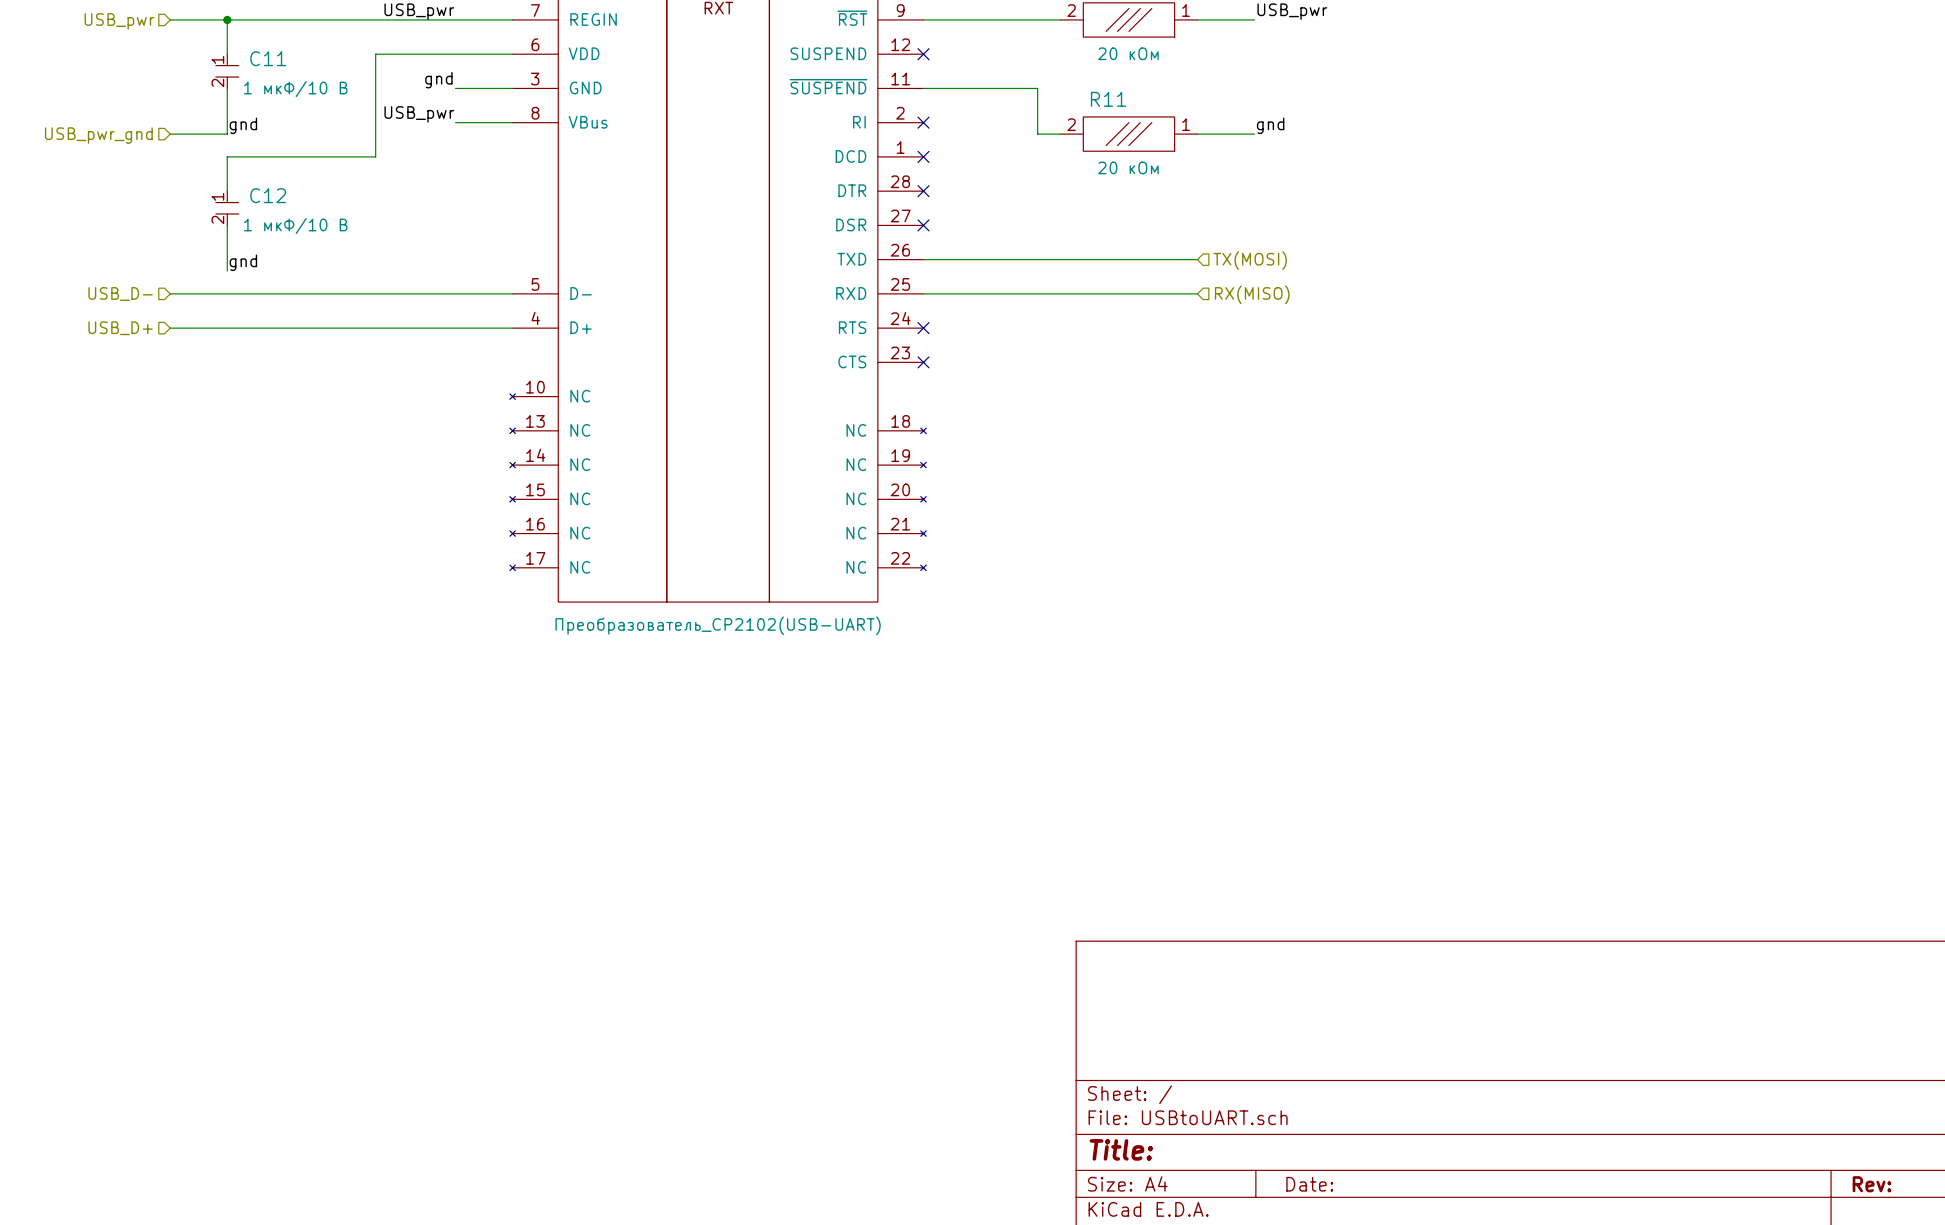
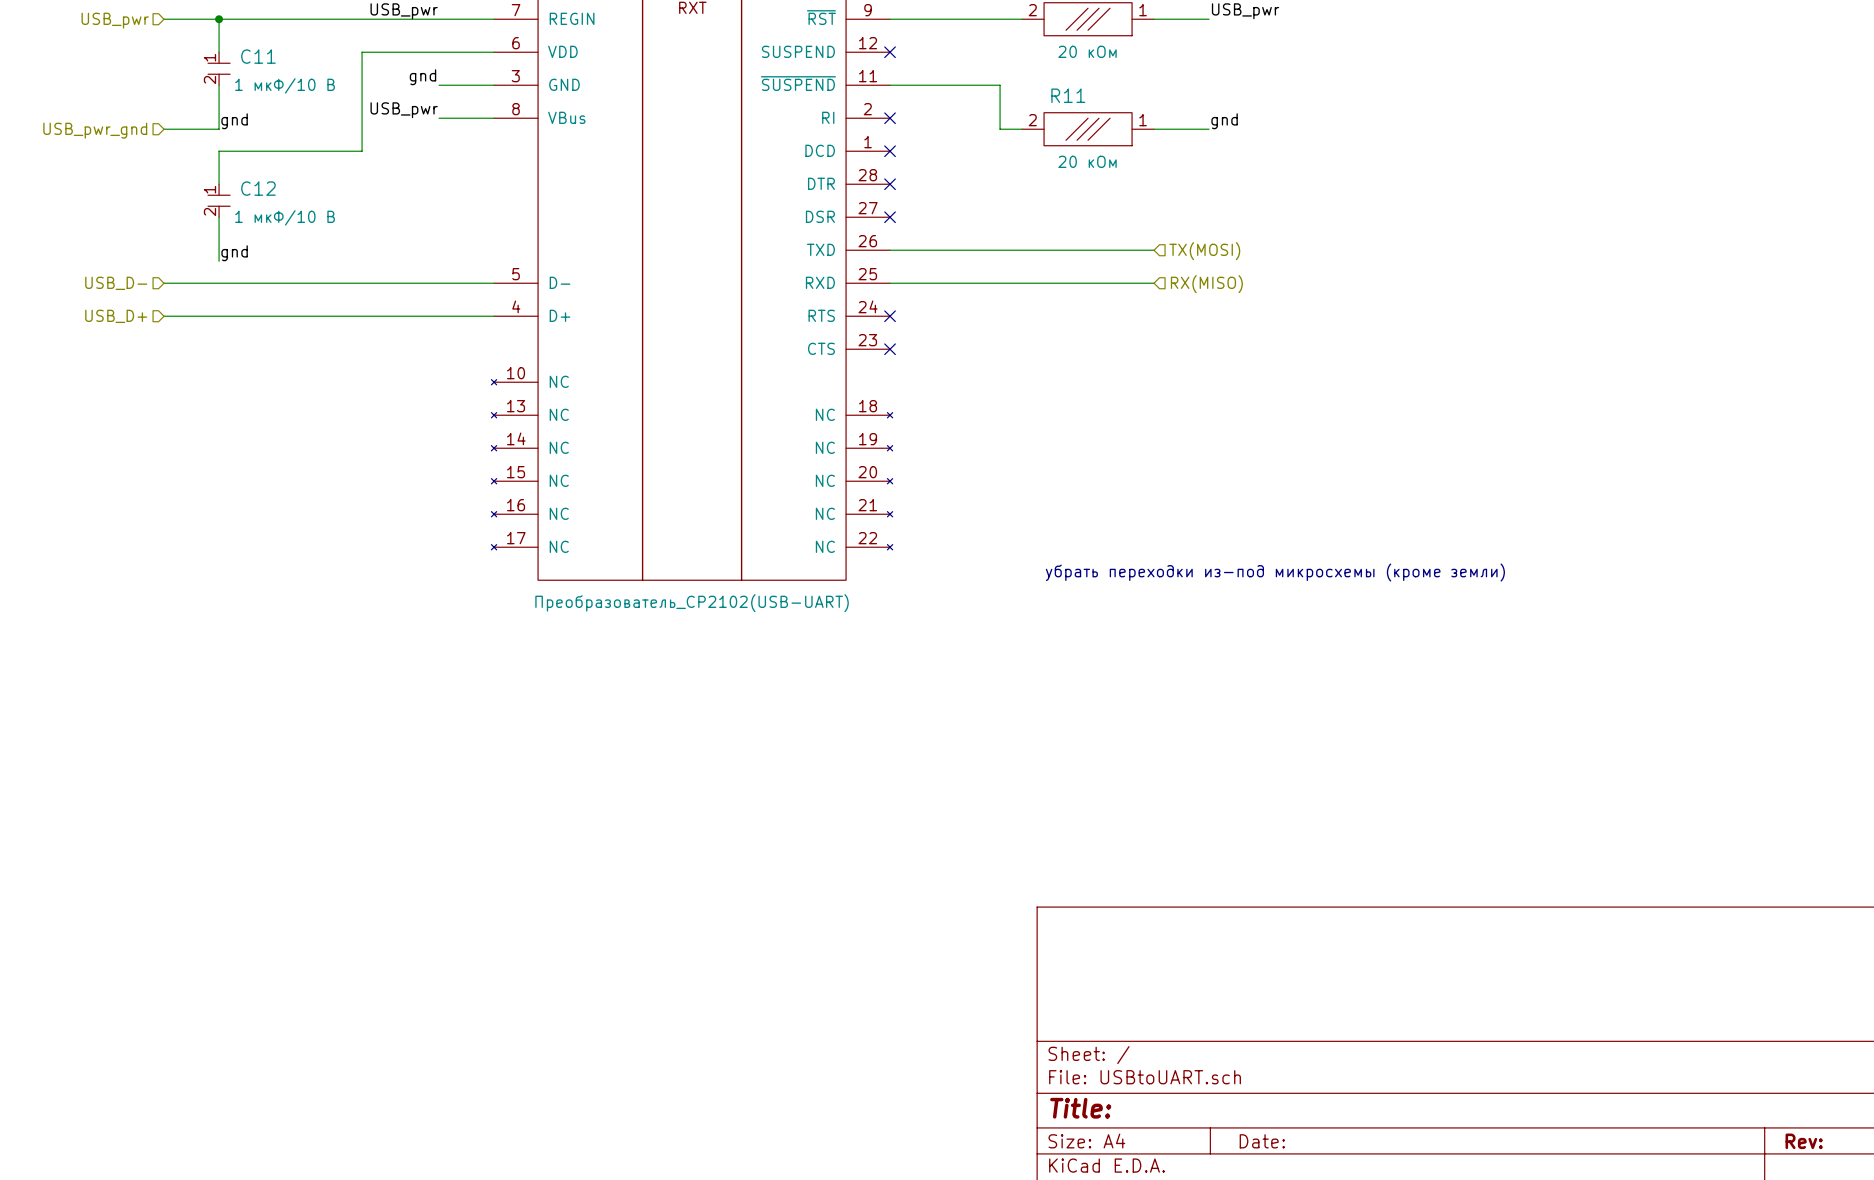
text: none -> убрать переходки из-под микросхемы (кроме земли) (1275, 572)

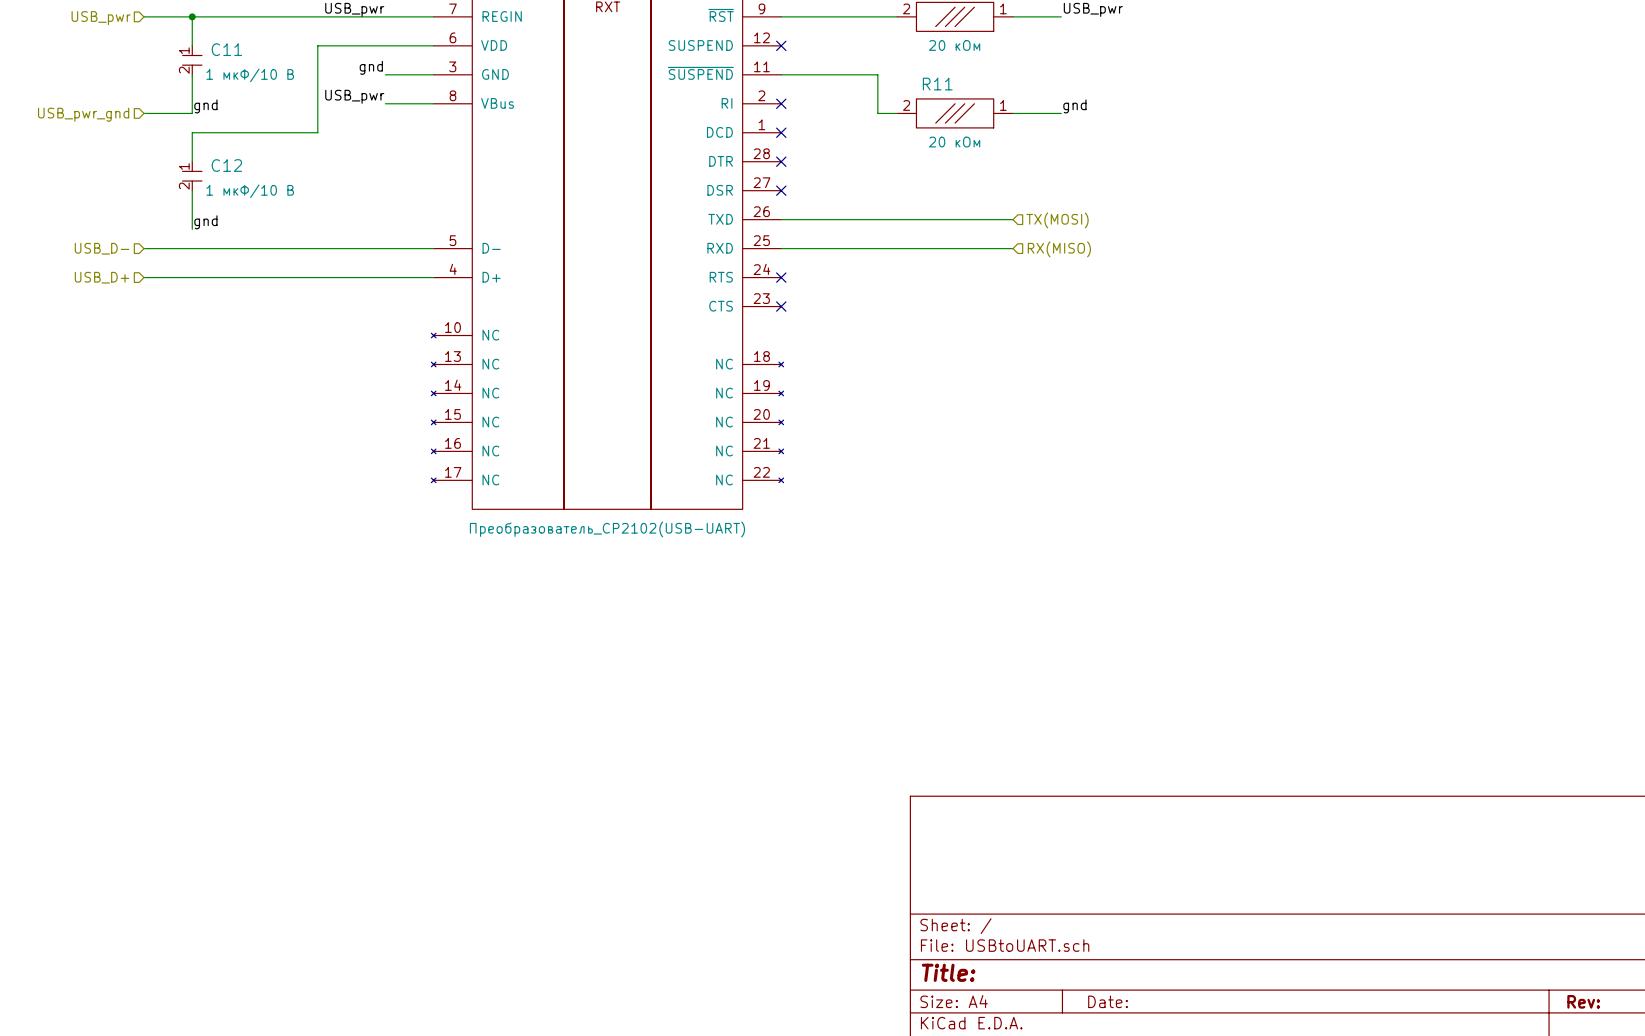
text: убрать переходки из-под микросхемы (кроме земли) (1275, 572) -> none

